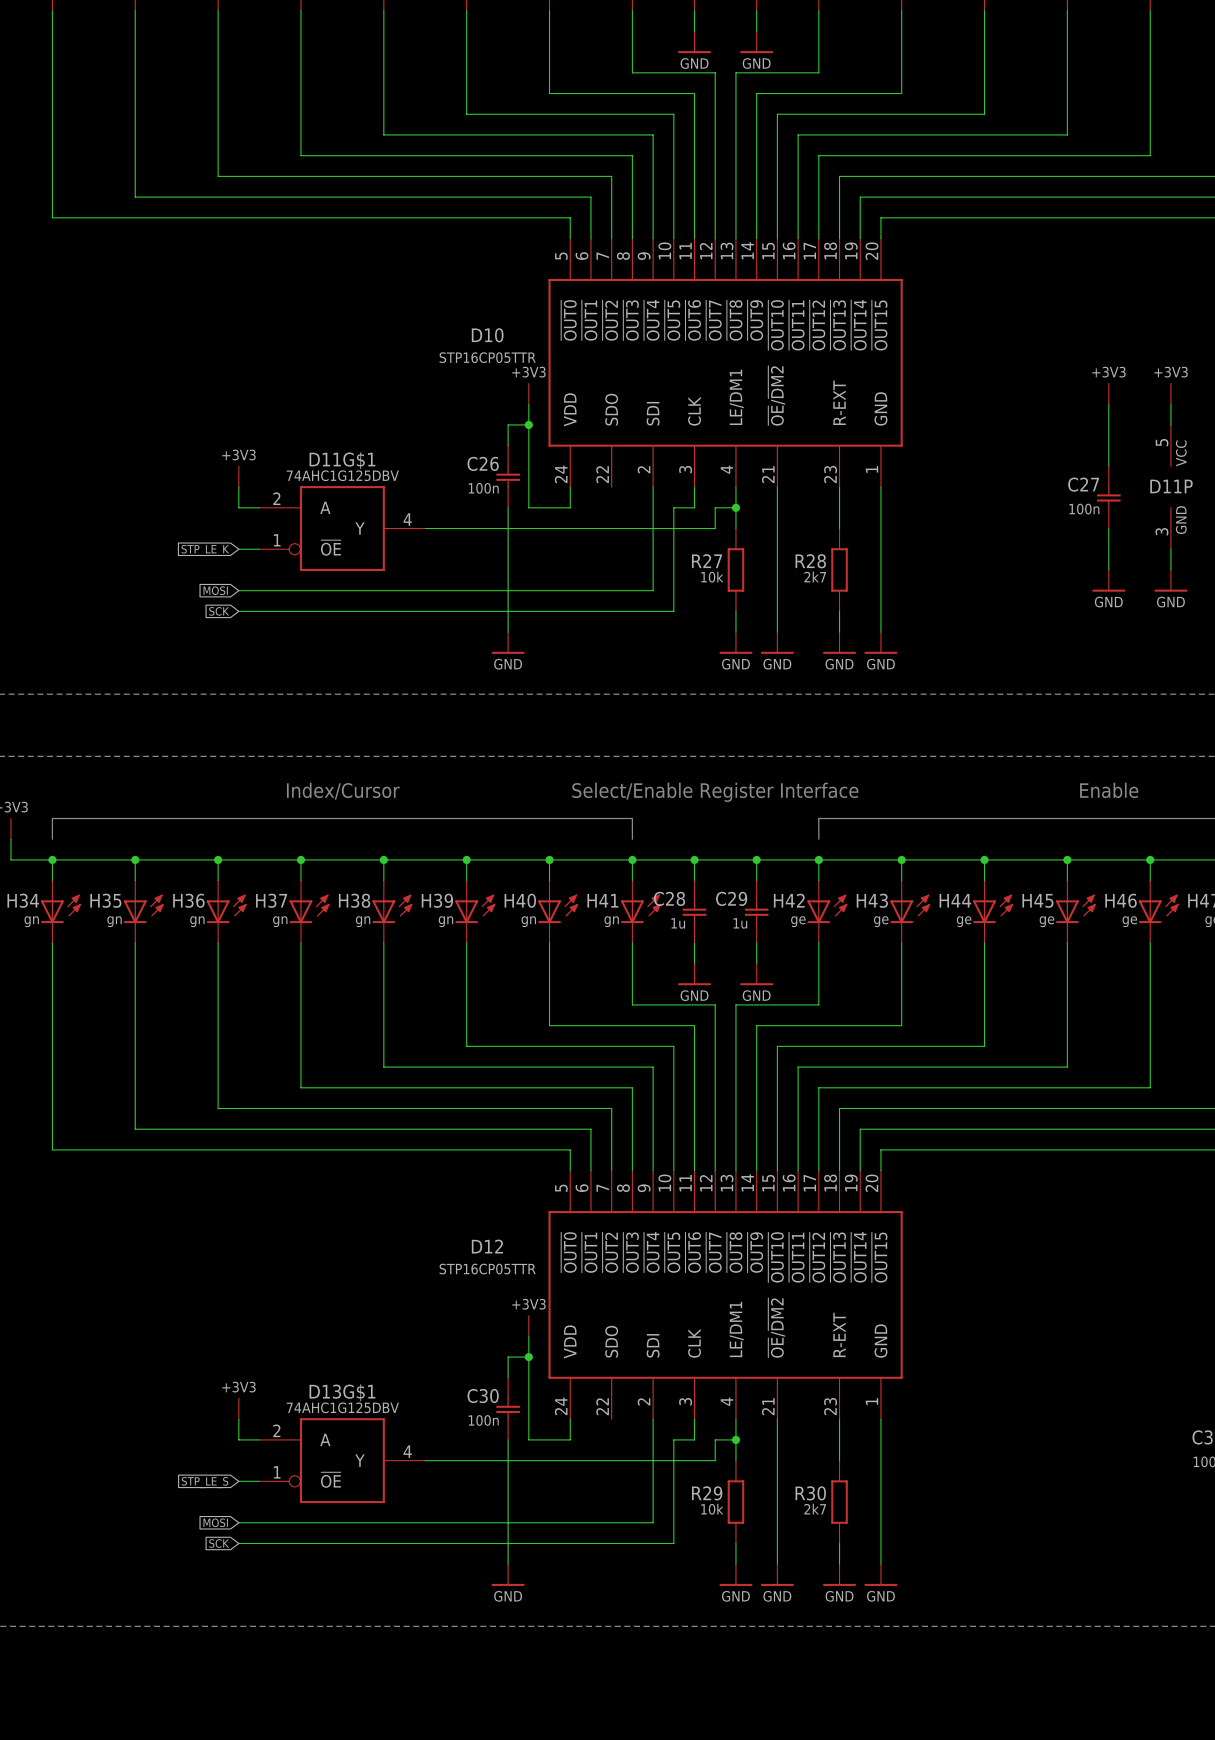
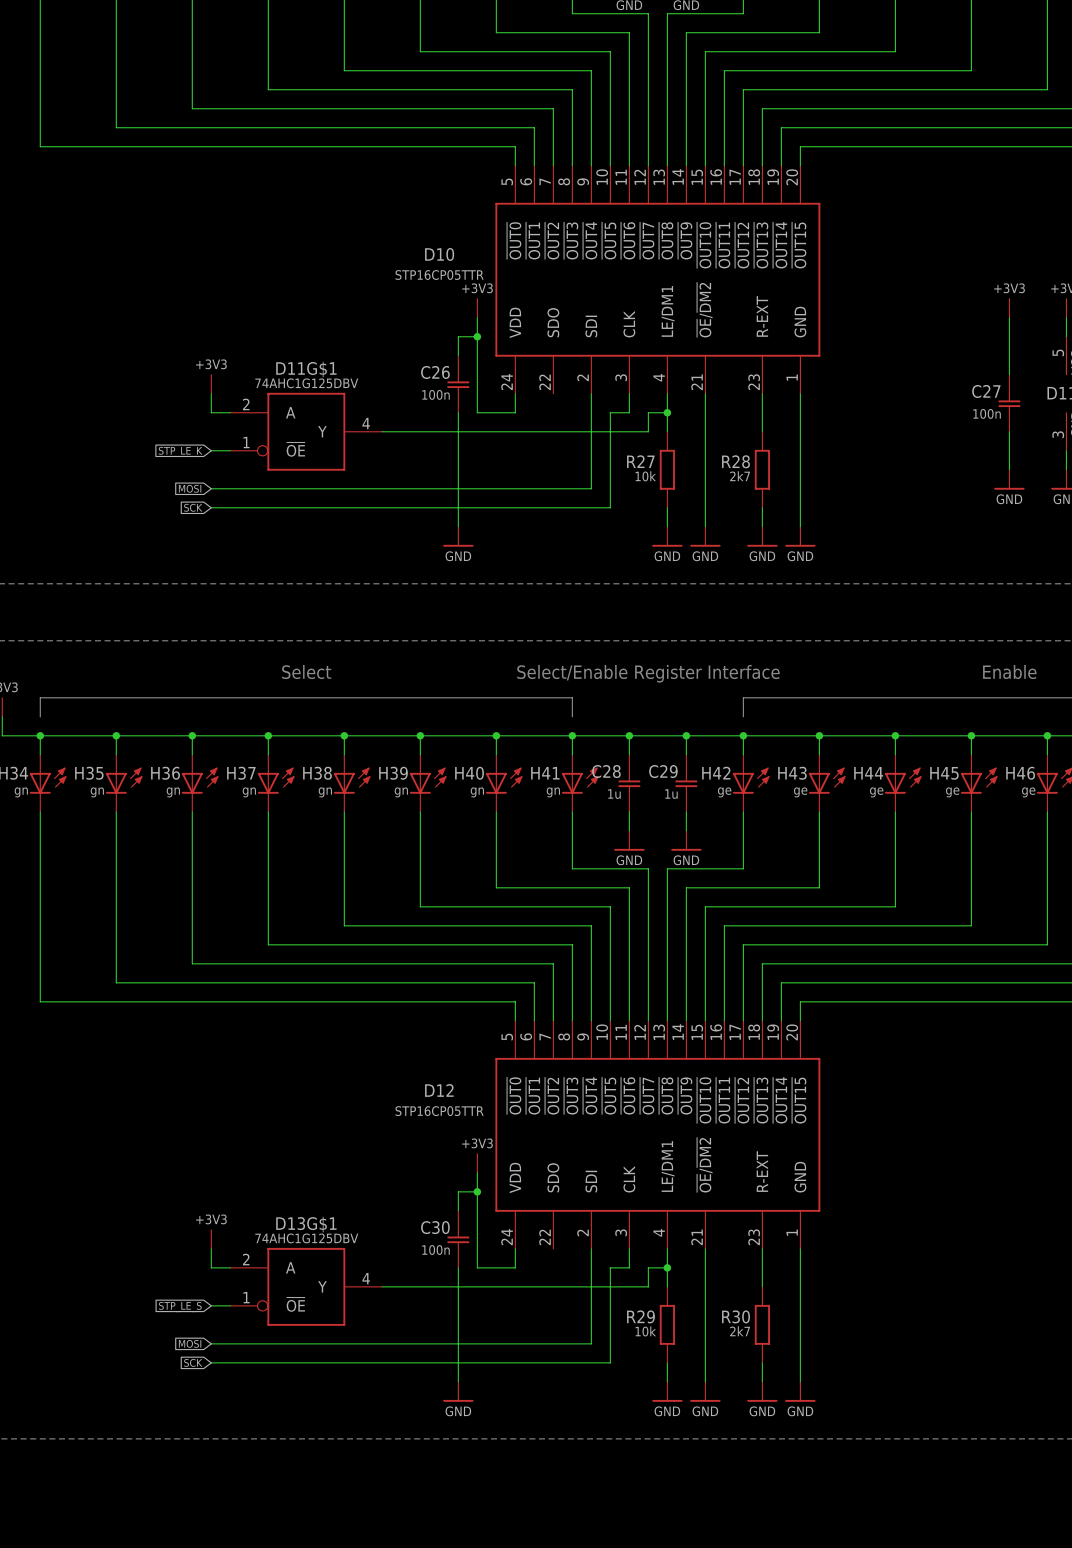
text: Index/Cursor (343, 791) -> Select (306, 671)

